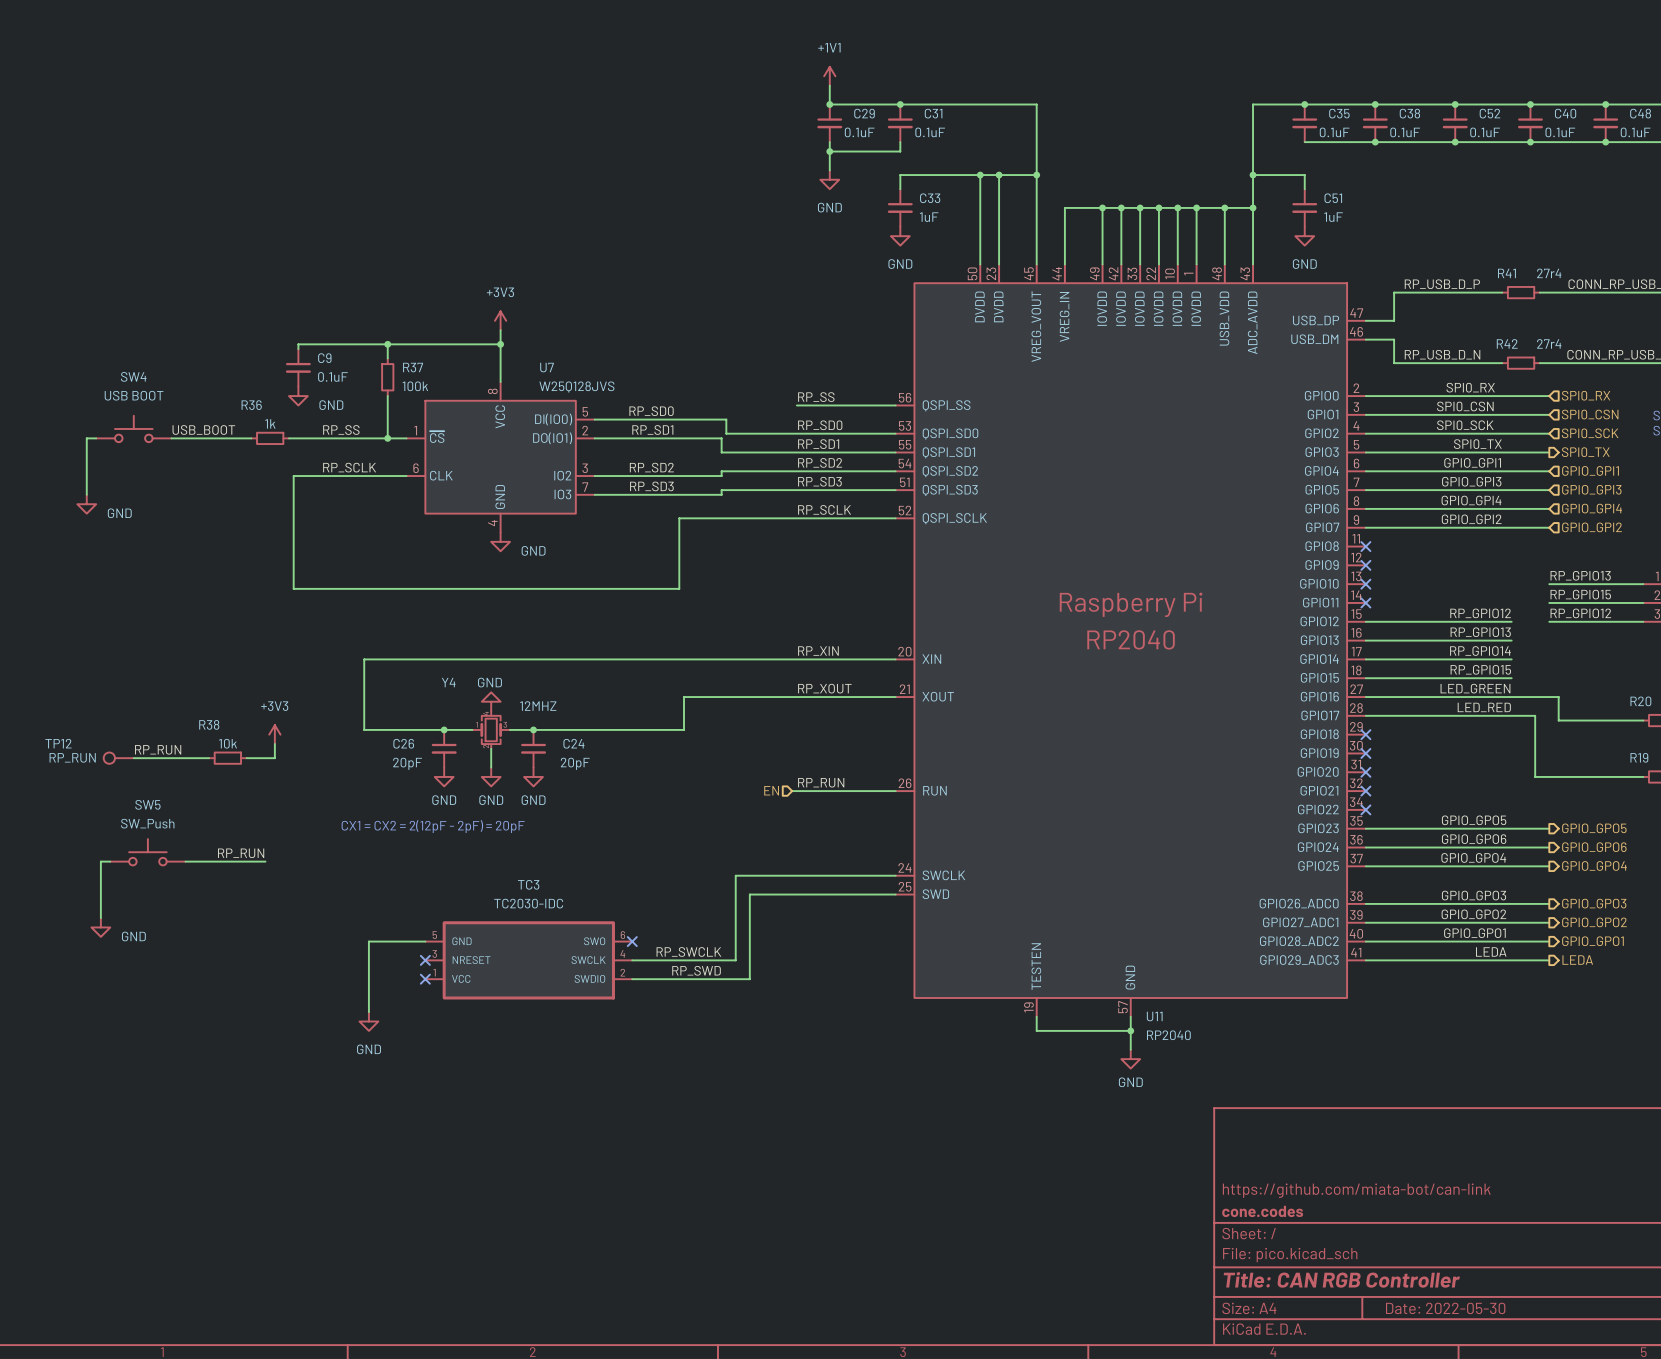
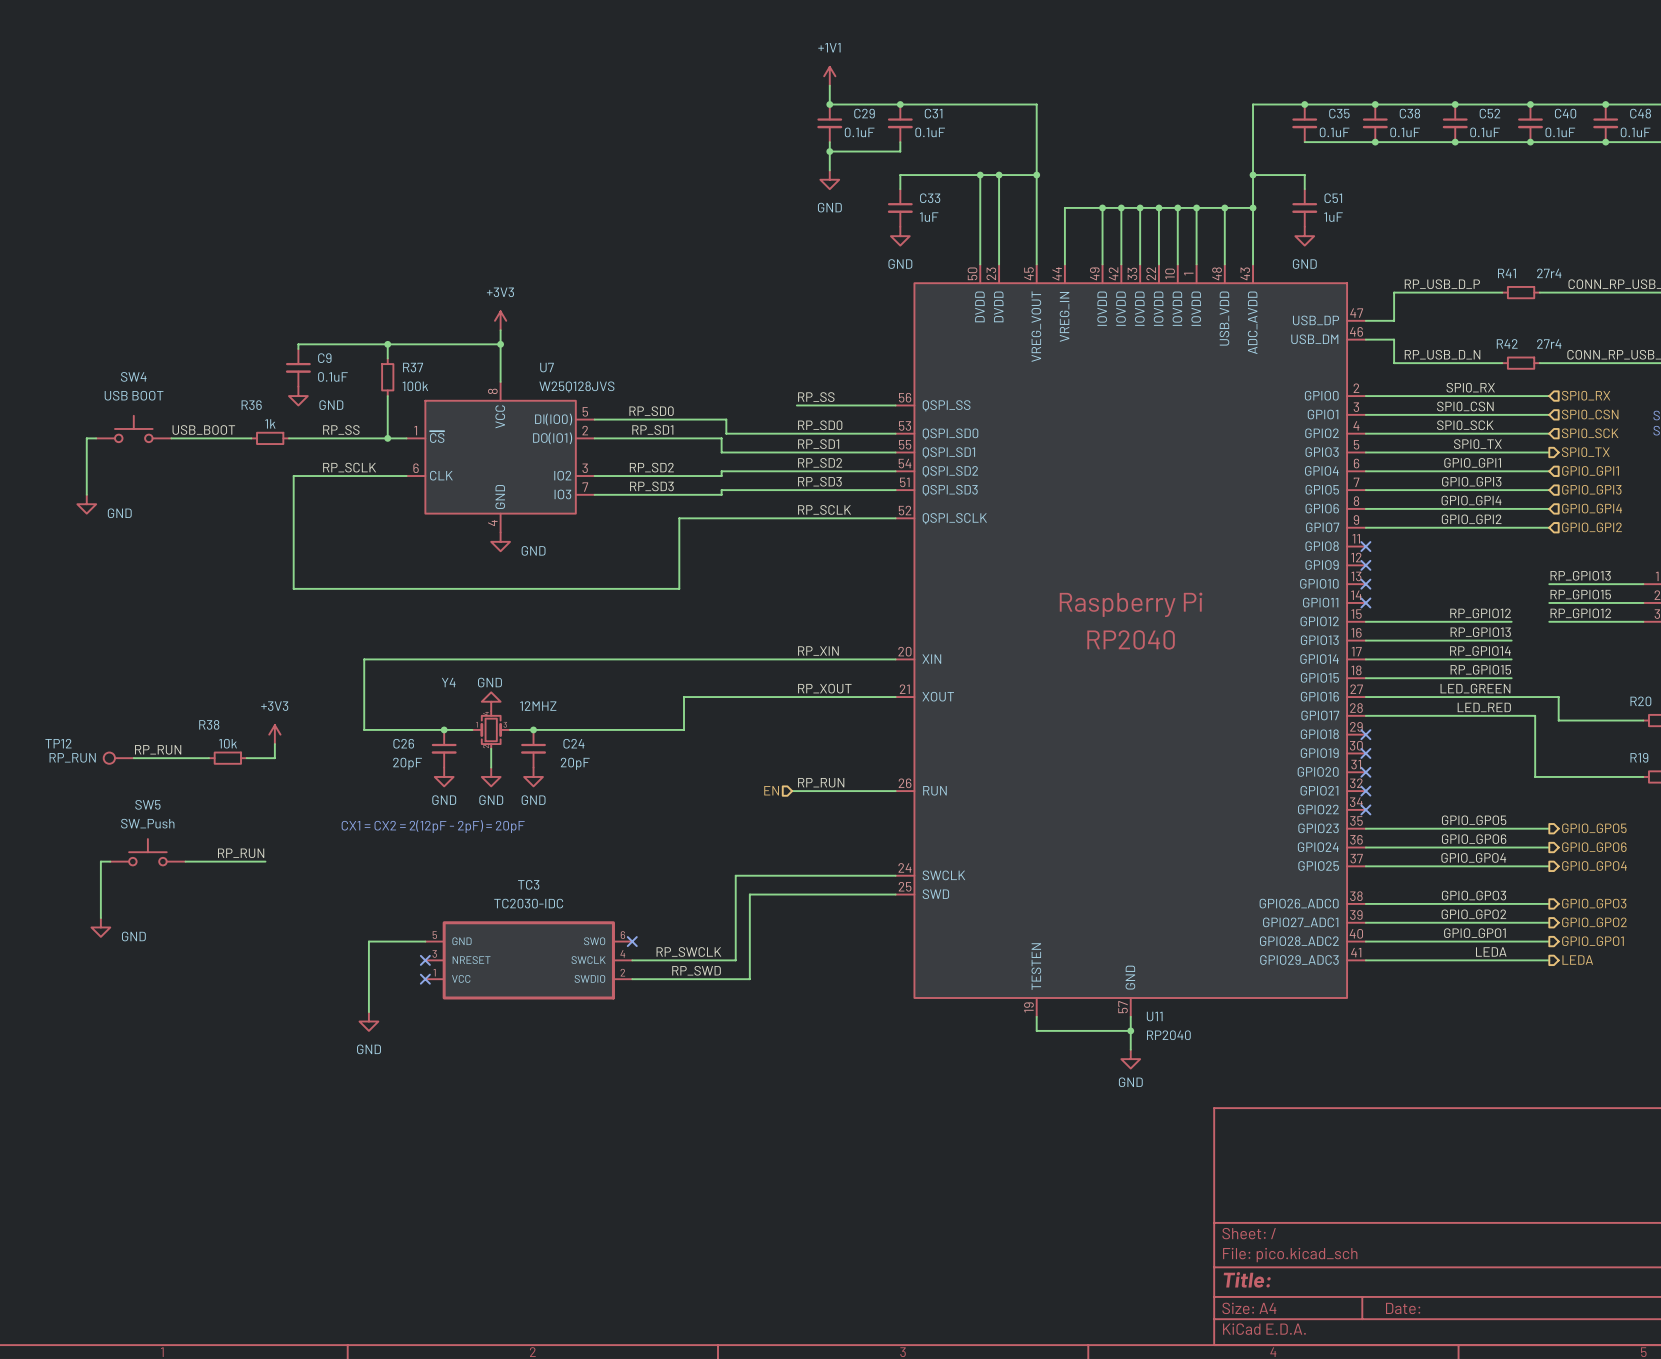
title block: https://github.com/miata-bot/can-link (1356, 1190) -> none
title block: cone.codes (1262, 1211) -> none
title block: Title: CAN RGB Controller (1341, 1279) -> Title: (1247, 1279)
title block: Date: 2022-05-30 (1445, 1308) -> Date: (1403, 1308)

